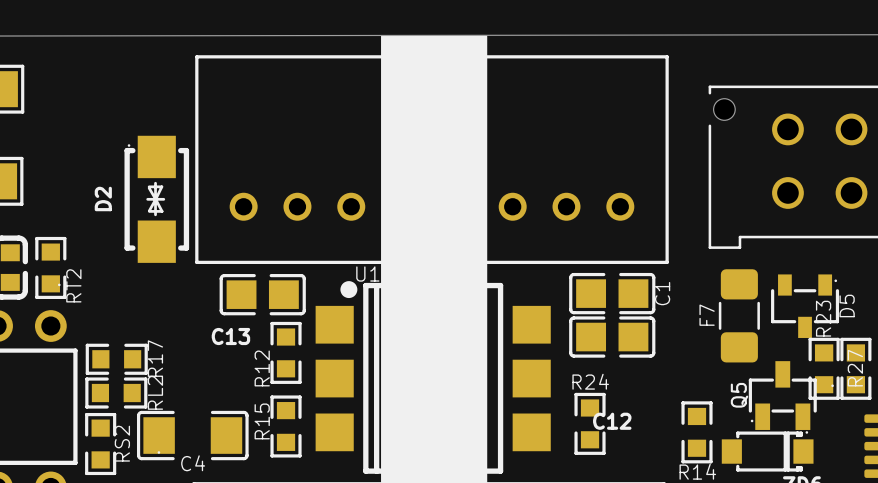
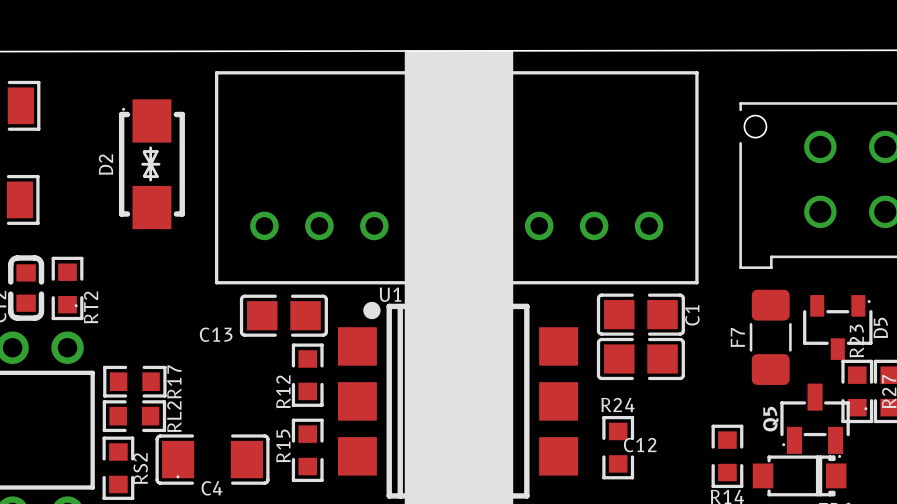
D2 name position: D2 (103, 199) -> D2 (105, 164)
D2 position: (156, 199) -> (151, 164)
C13 name position: C13 (230, 336) -> C13 (216, 334)

